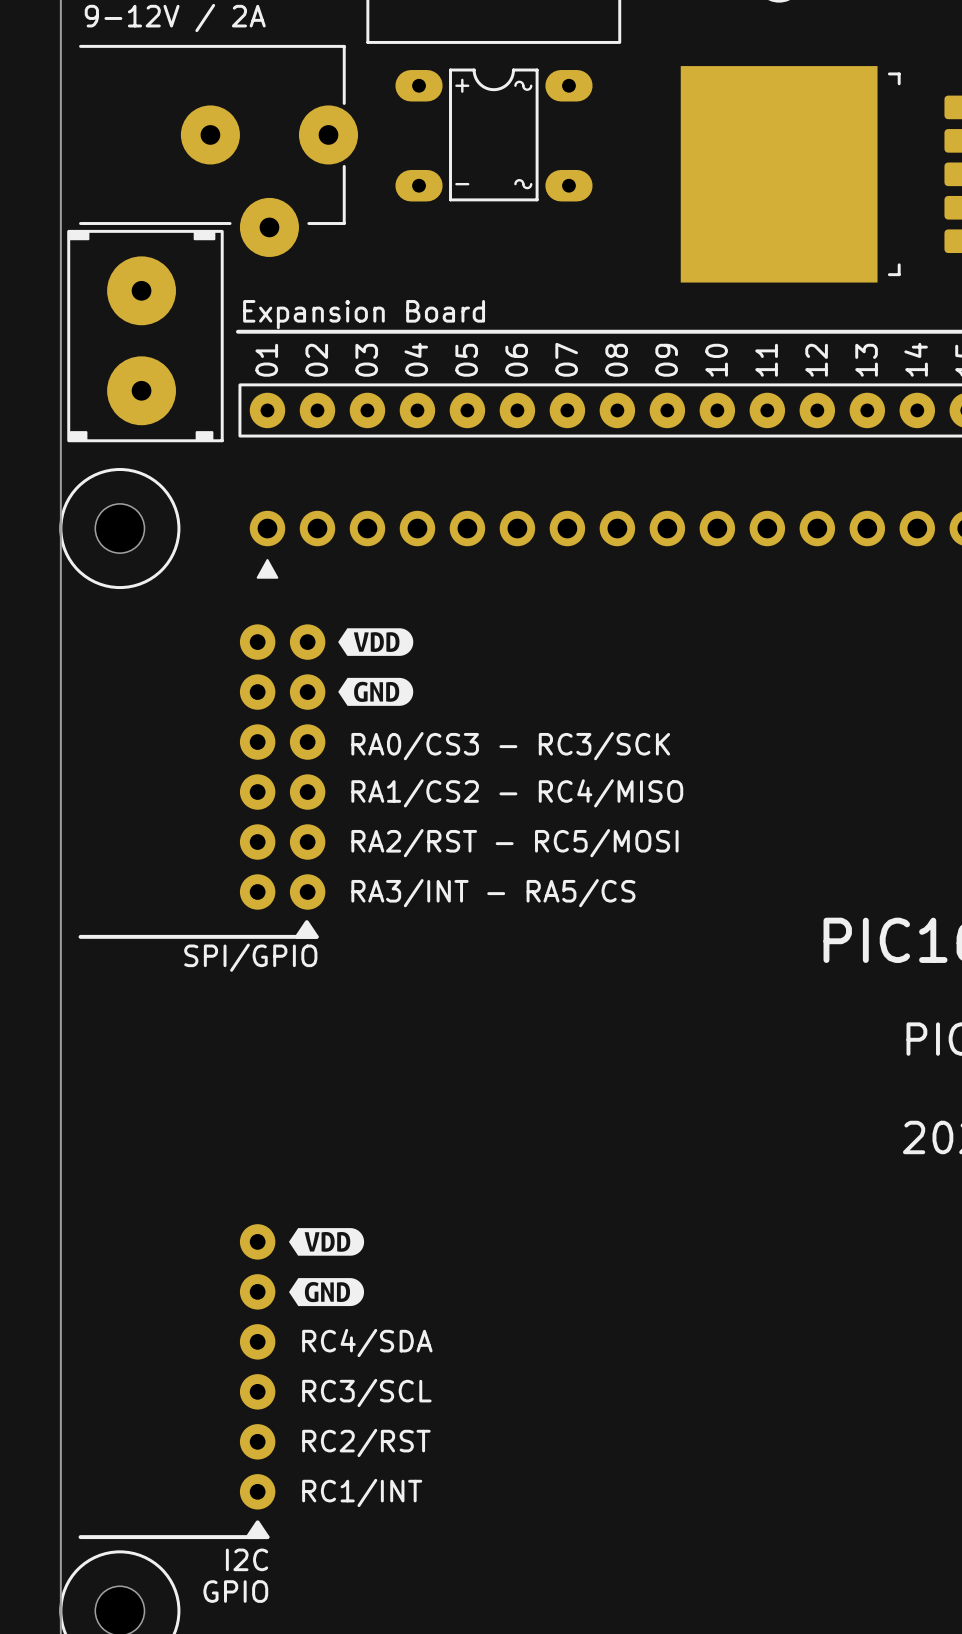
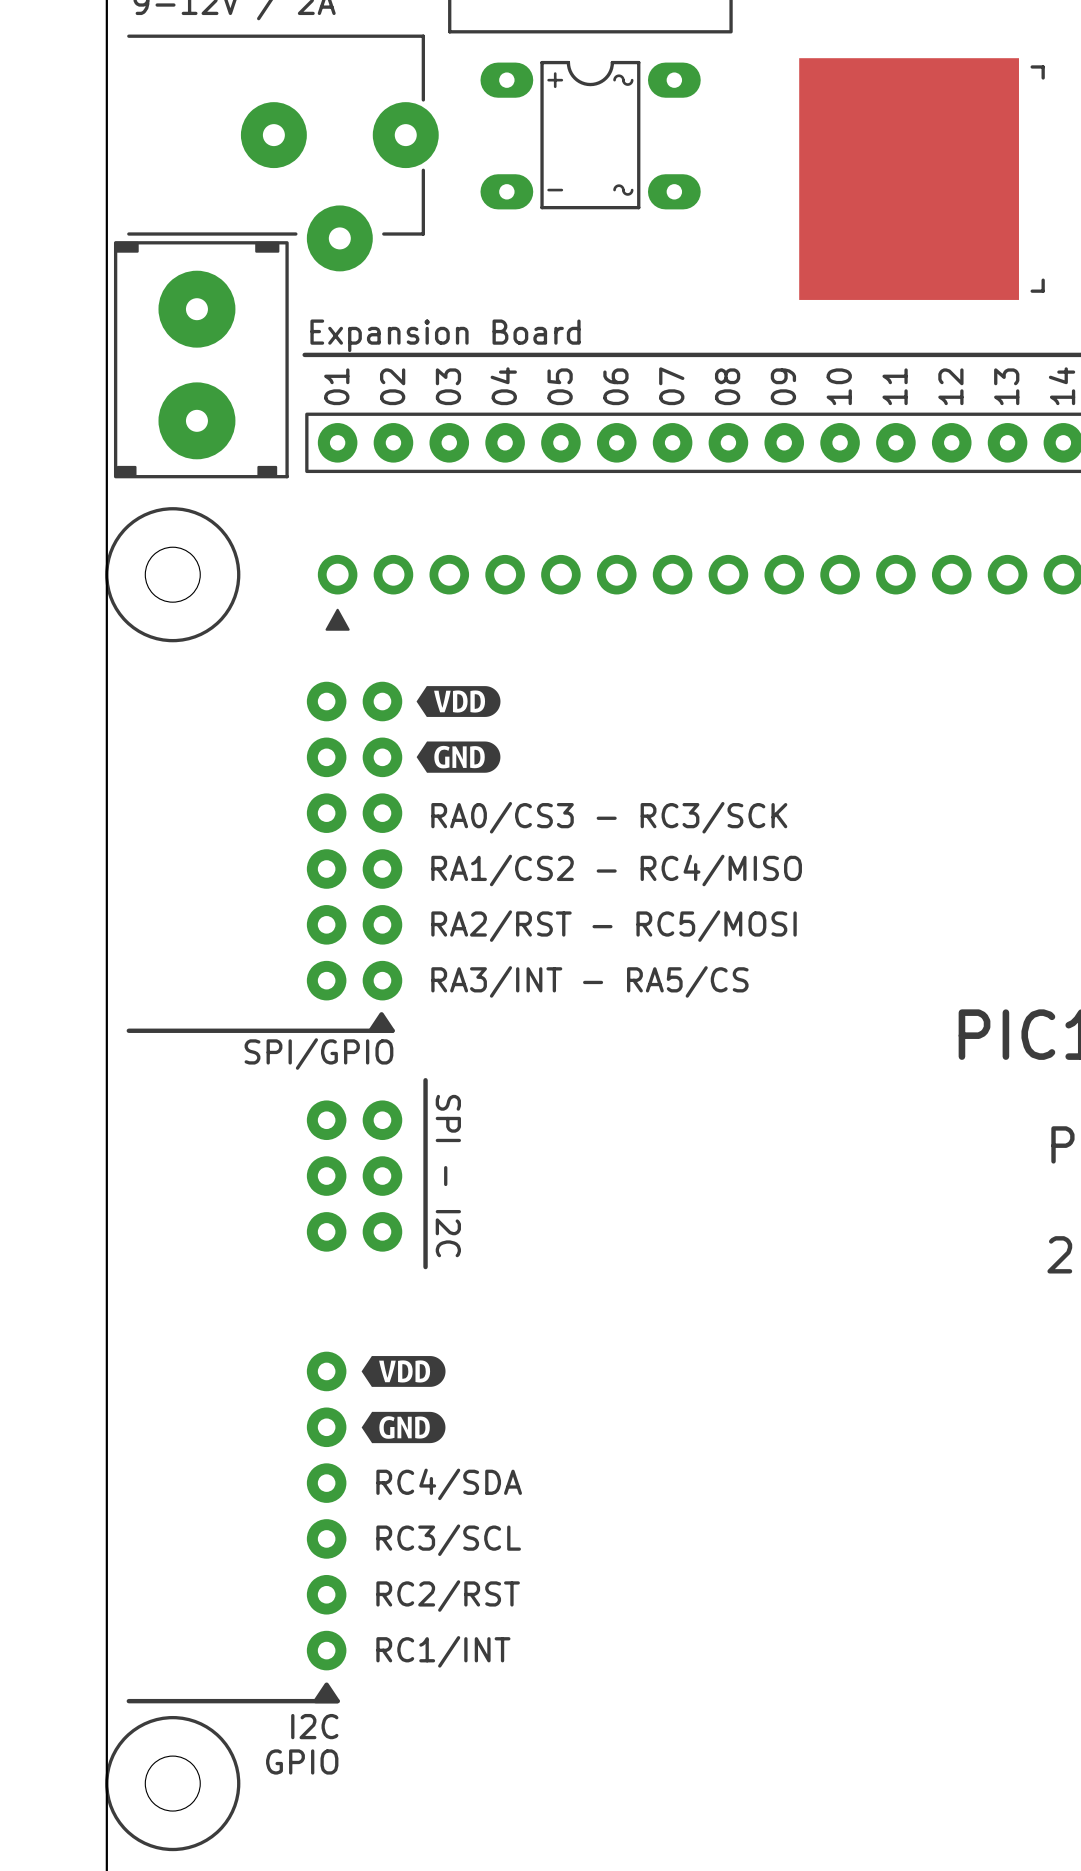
line: none -> (425, 1080) (425, 1267)
part: none -> (354, 1176)
text: none -> SPI - I2C (448, 1176)

